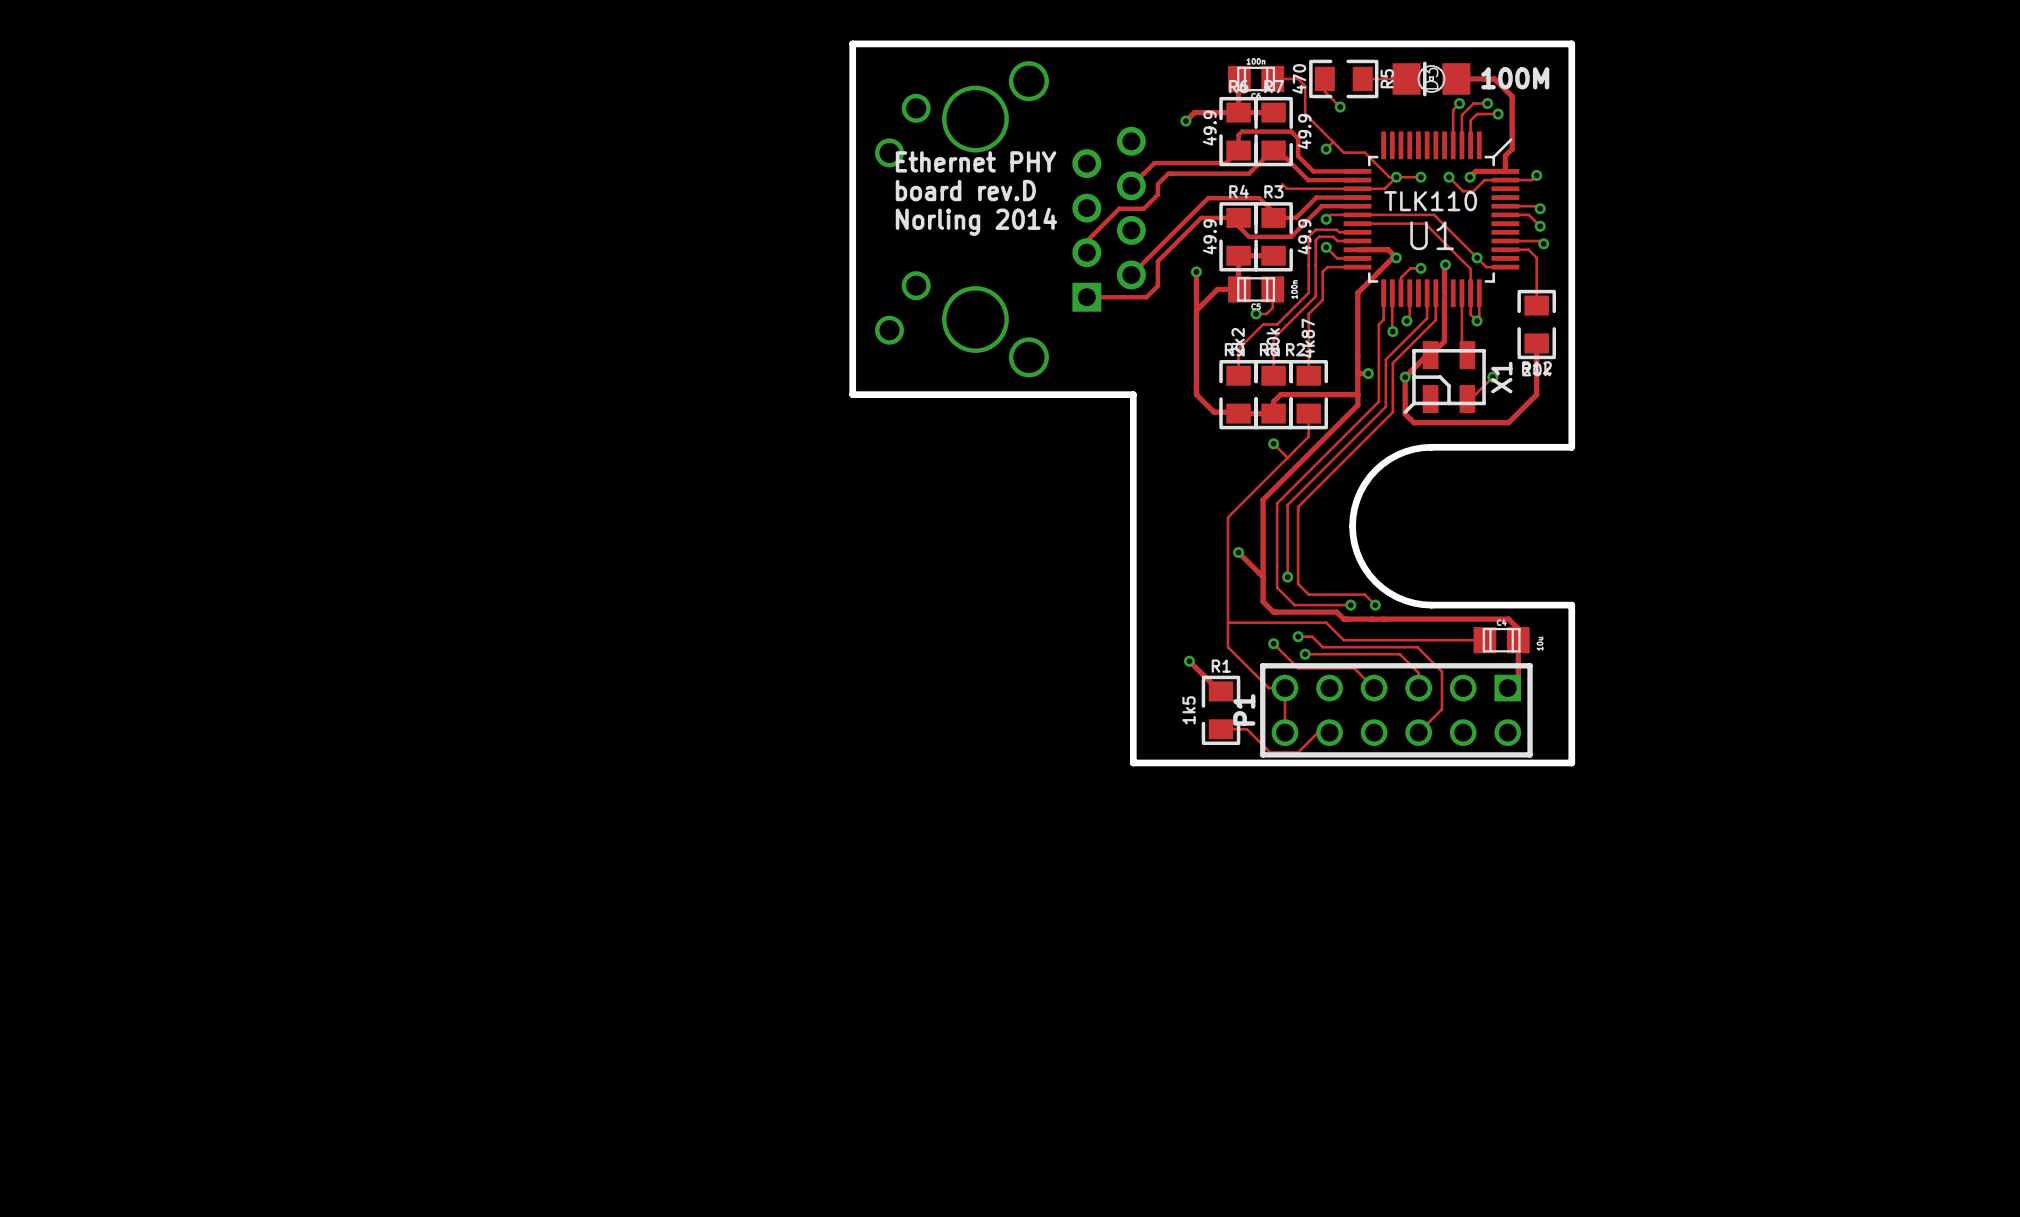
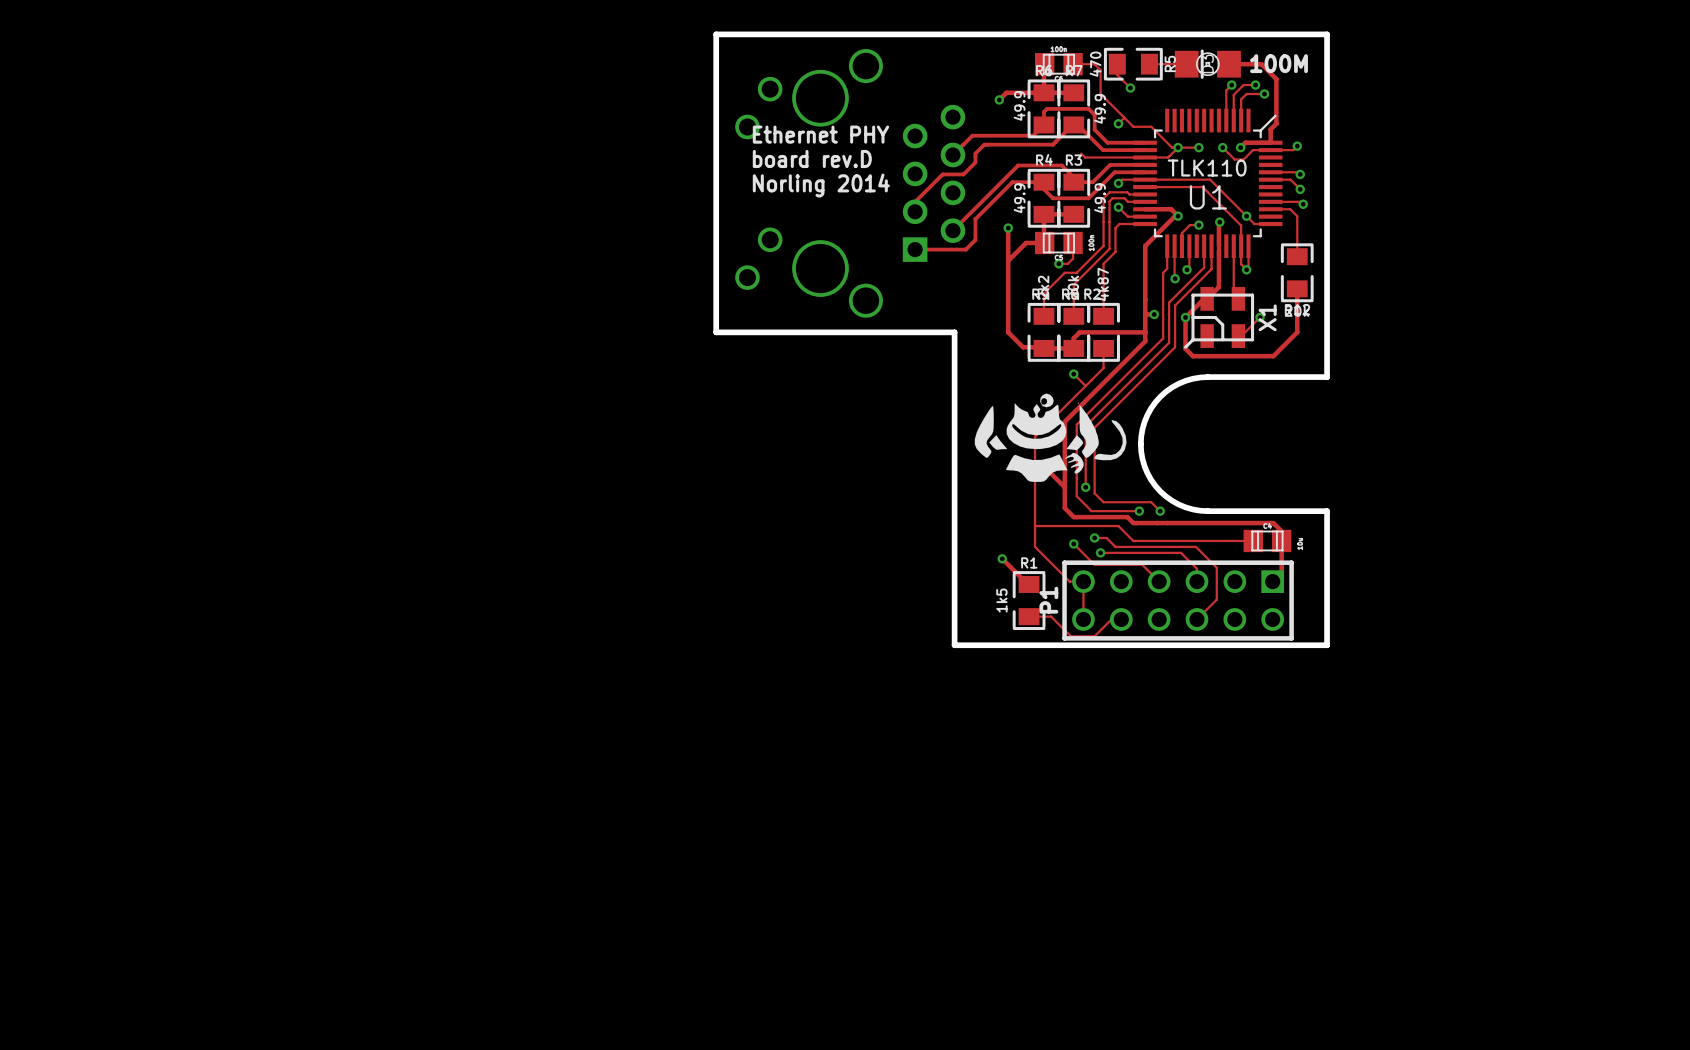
drawing: none -> [974, 393, 1127, 482]

